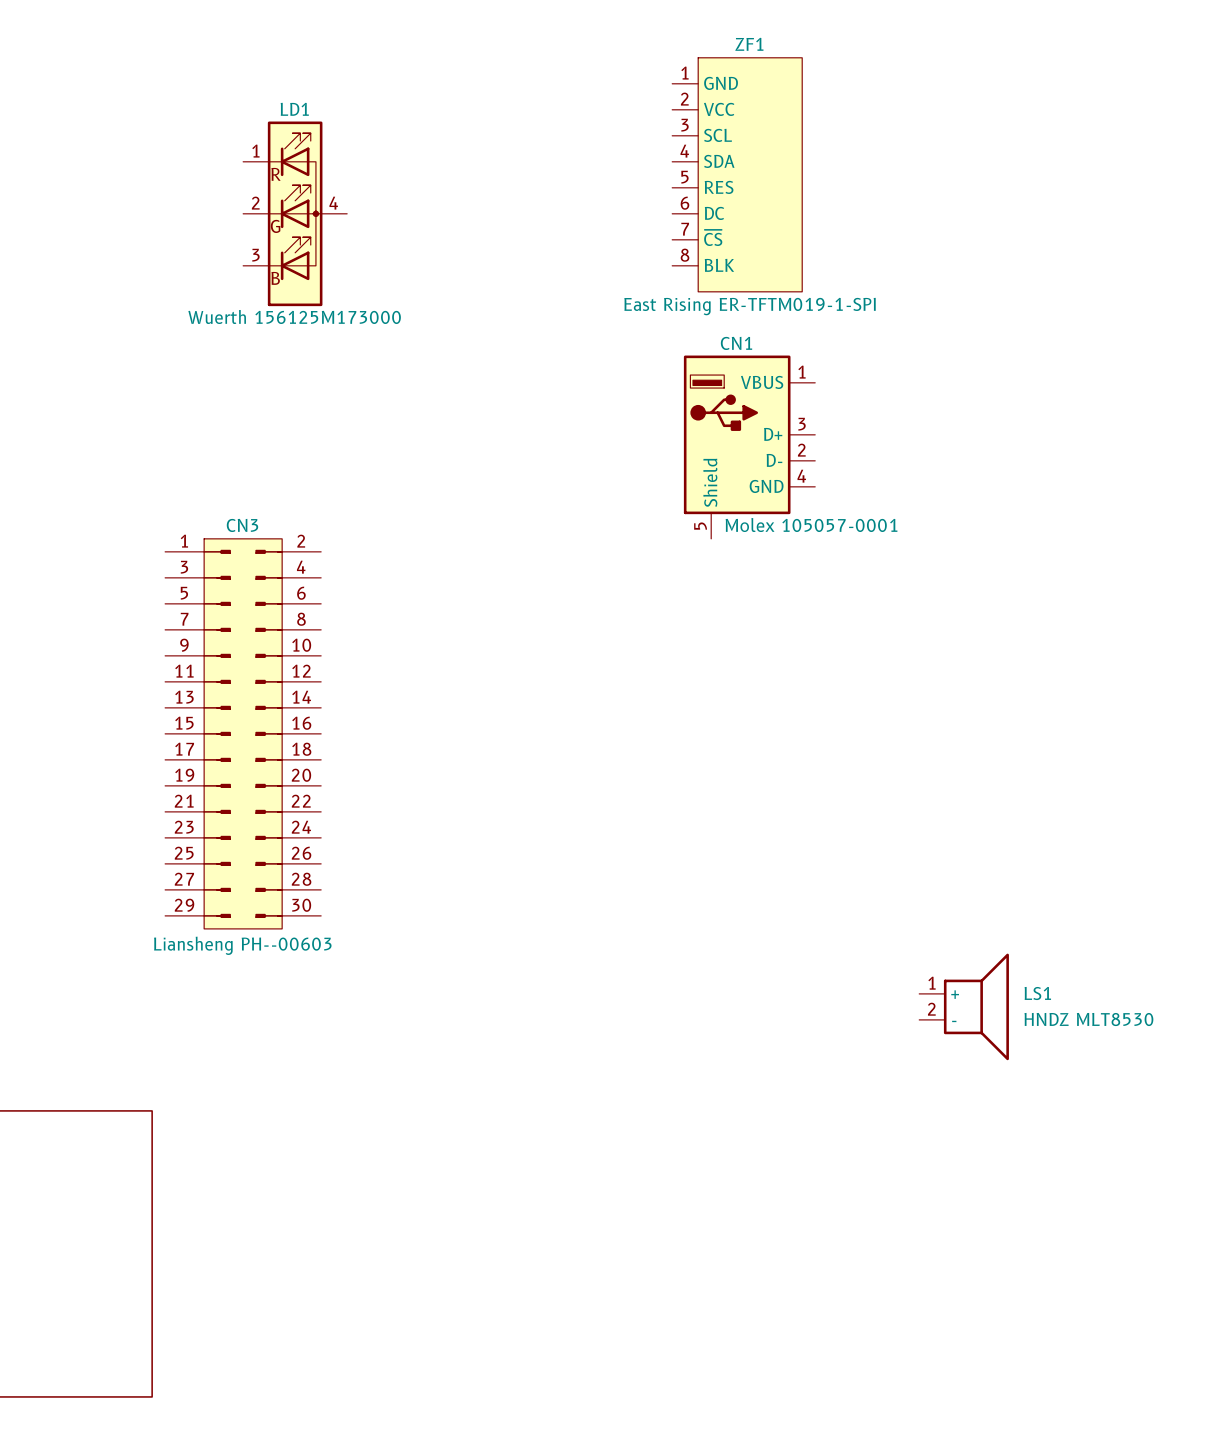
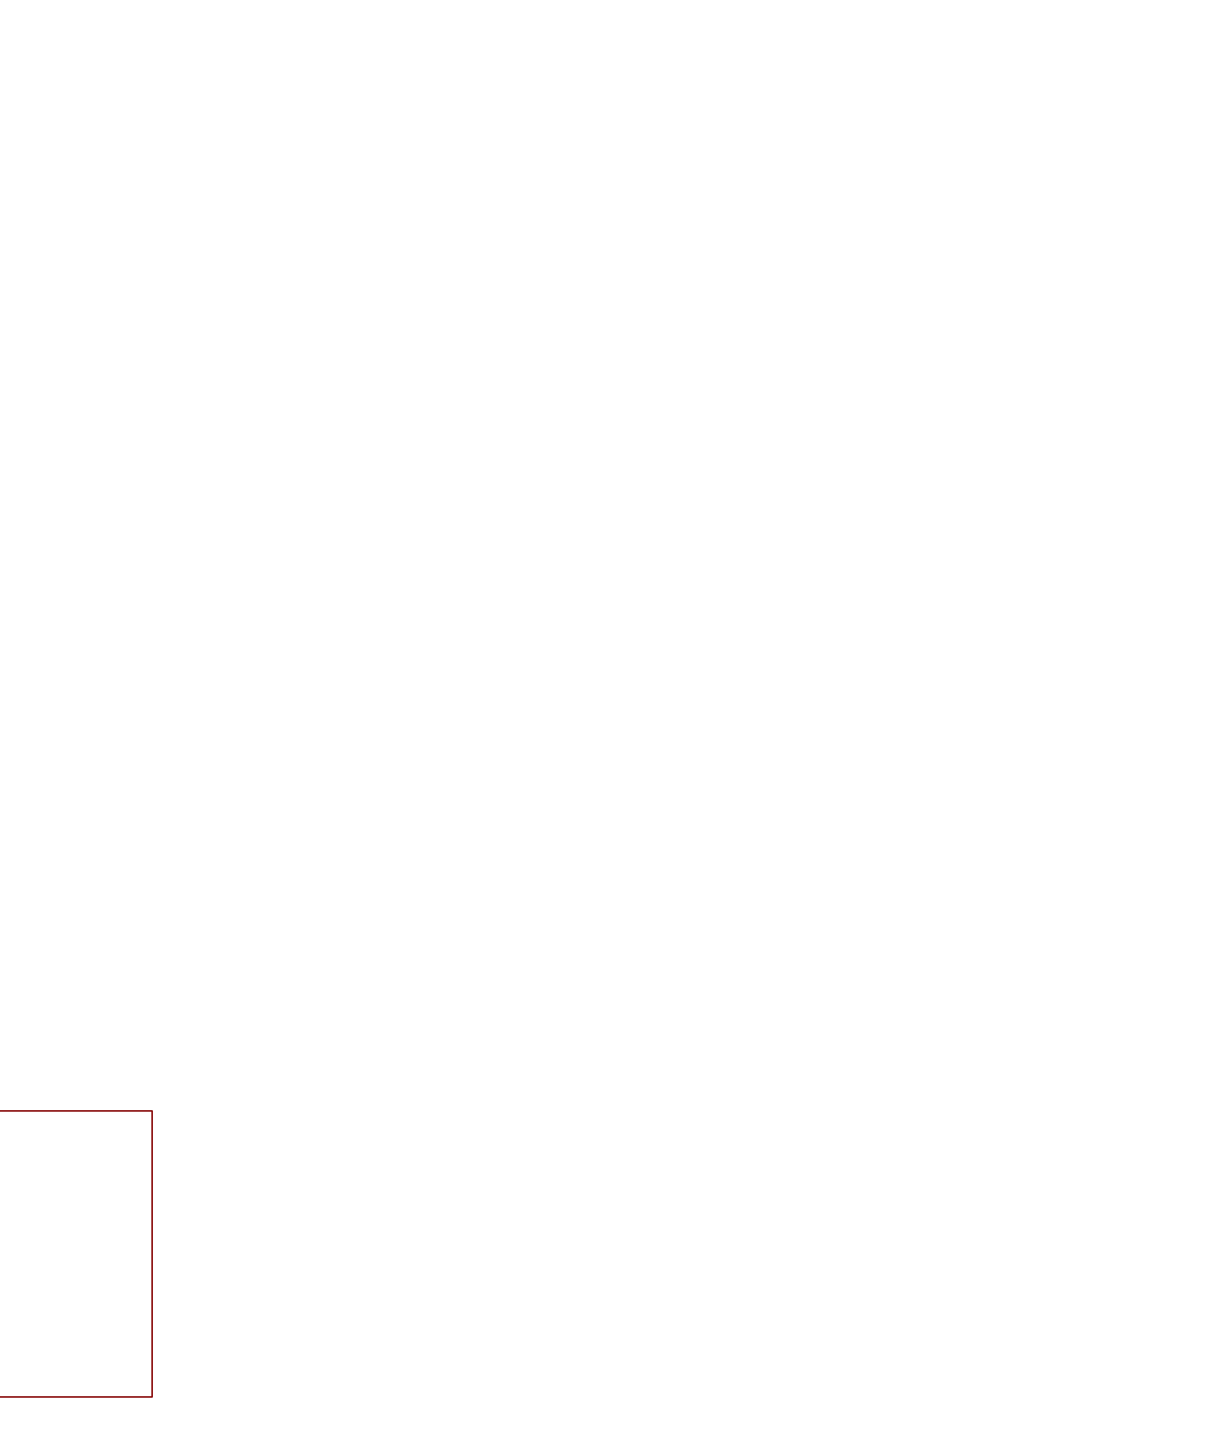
ZF1: East Rising ER-TFTM019-1-SPI (737, 174) -> none
LD1: Wuerth 156125M173000 (295, 213) -> none
CN1: Molex 105057-0001 (749, 447) -> none
CN3: Liansheng PH--00603 (243, 733) -> none
LS1: HNDZ MLT8530 (964, 1006) -> none

